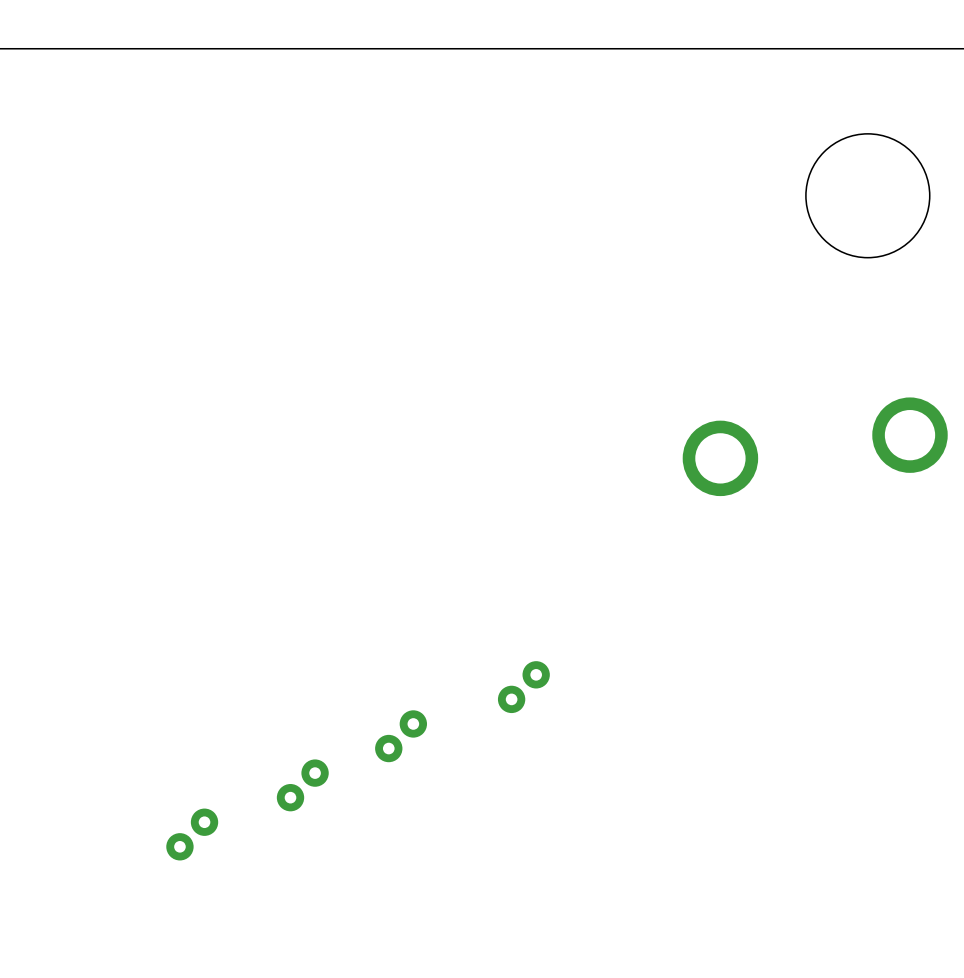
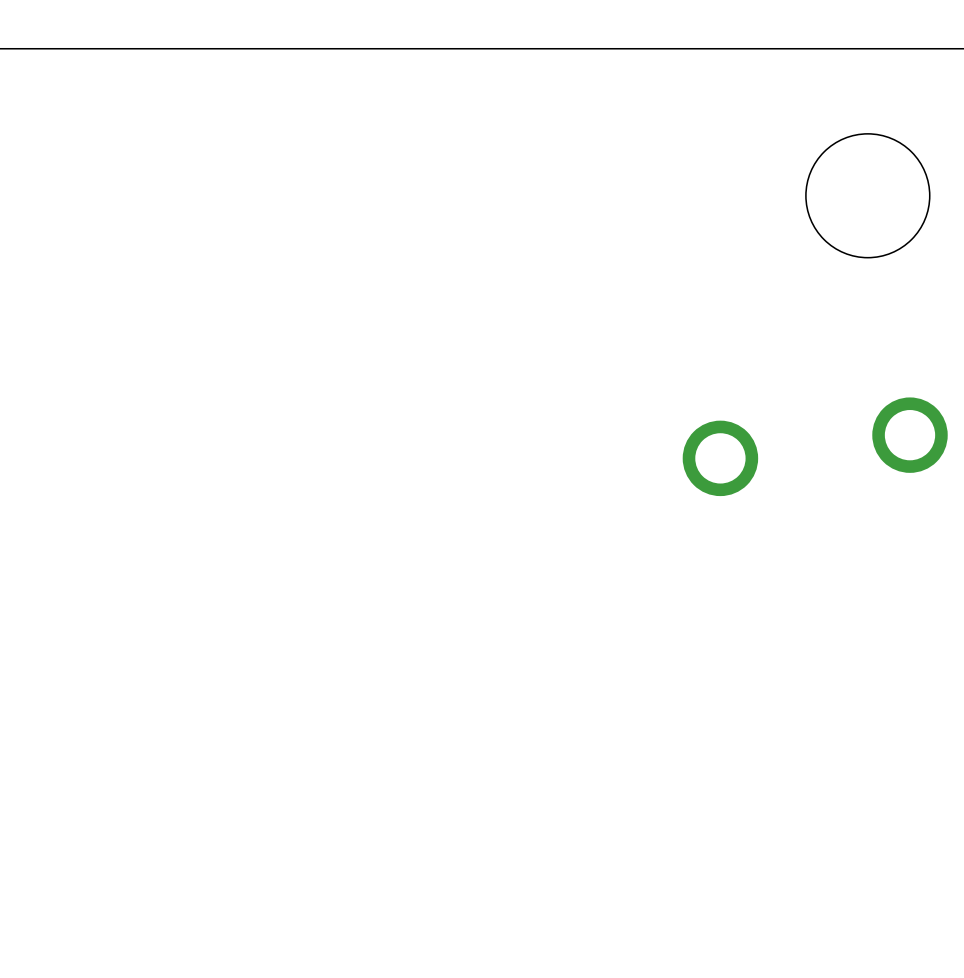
via: (536, 674) -> none
via: (511, 699) -> none
via: (413, 723) -> none
via: (388, 748) -> none
via: (315, 773) -> none
via: (290, 797) -> none
via: (204, 822) -> none
via: (179, 846) -> none

